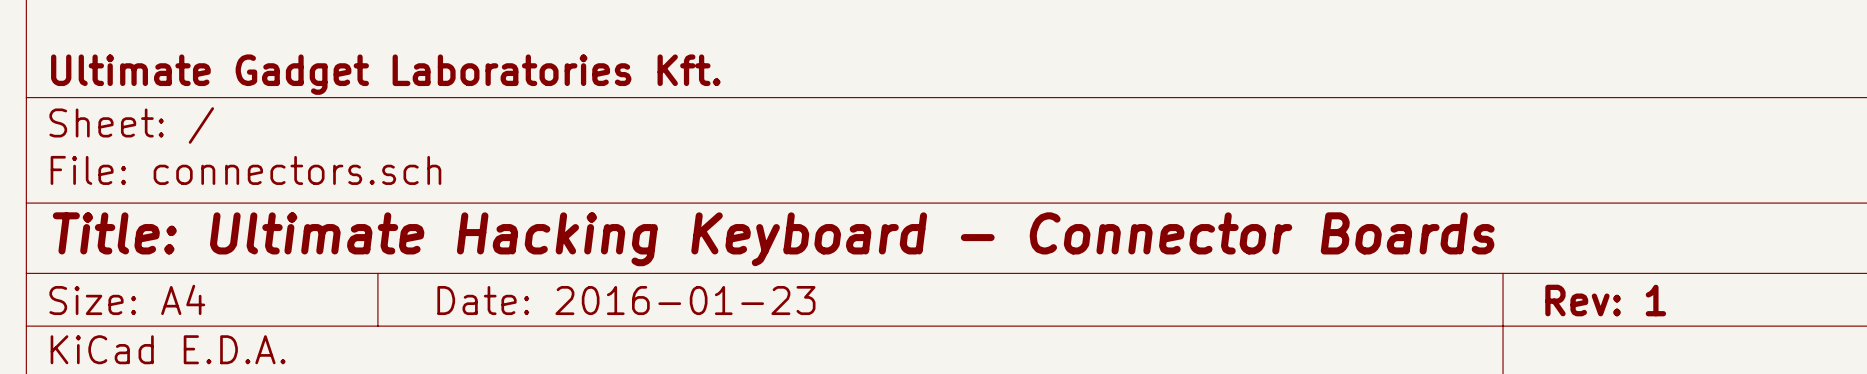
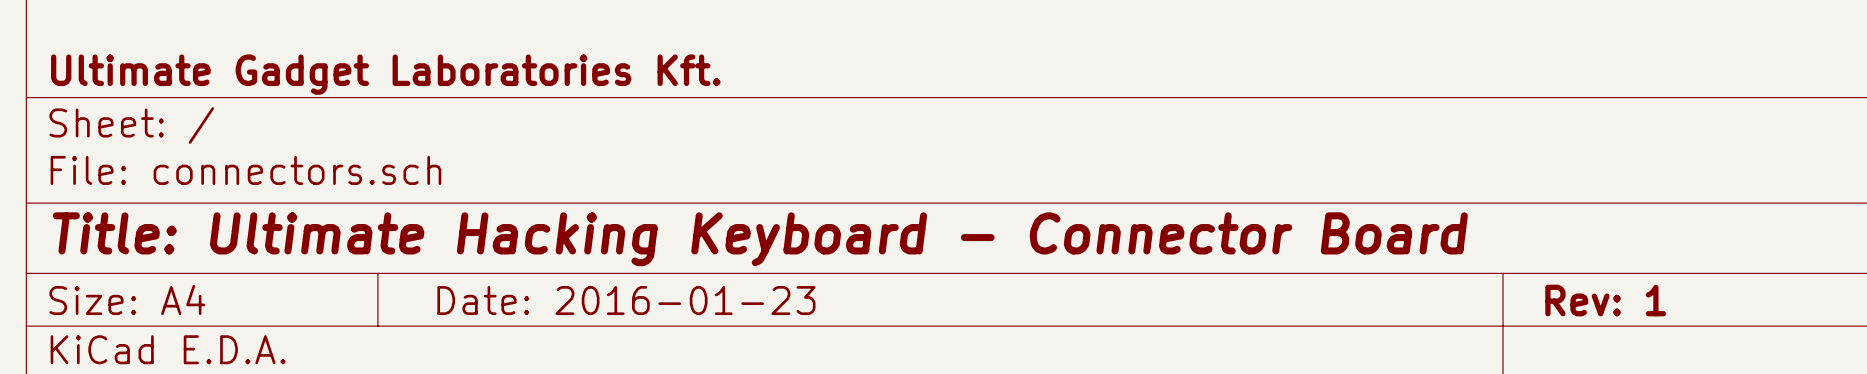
title block: Title: Ultimate Hacking Keyboard - Connector Boards (773, 239) -> Title: Ultimate Hacking Keyboard - Connector Board (760, 239)

